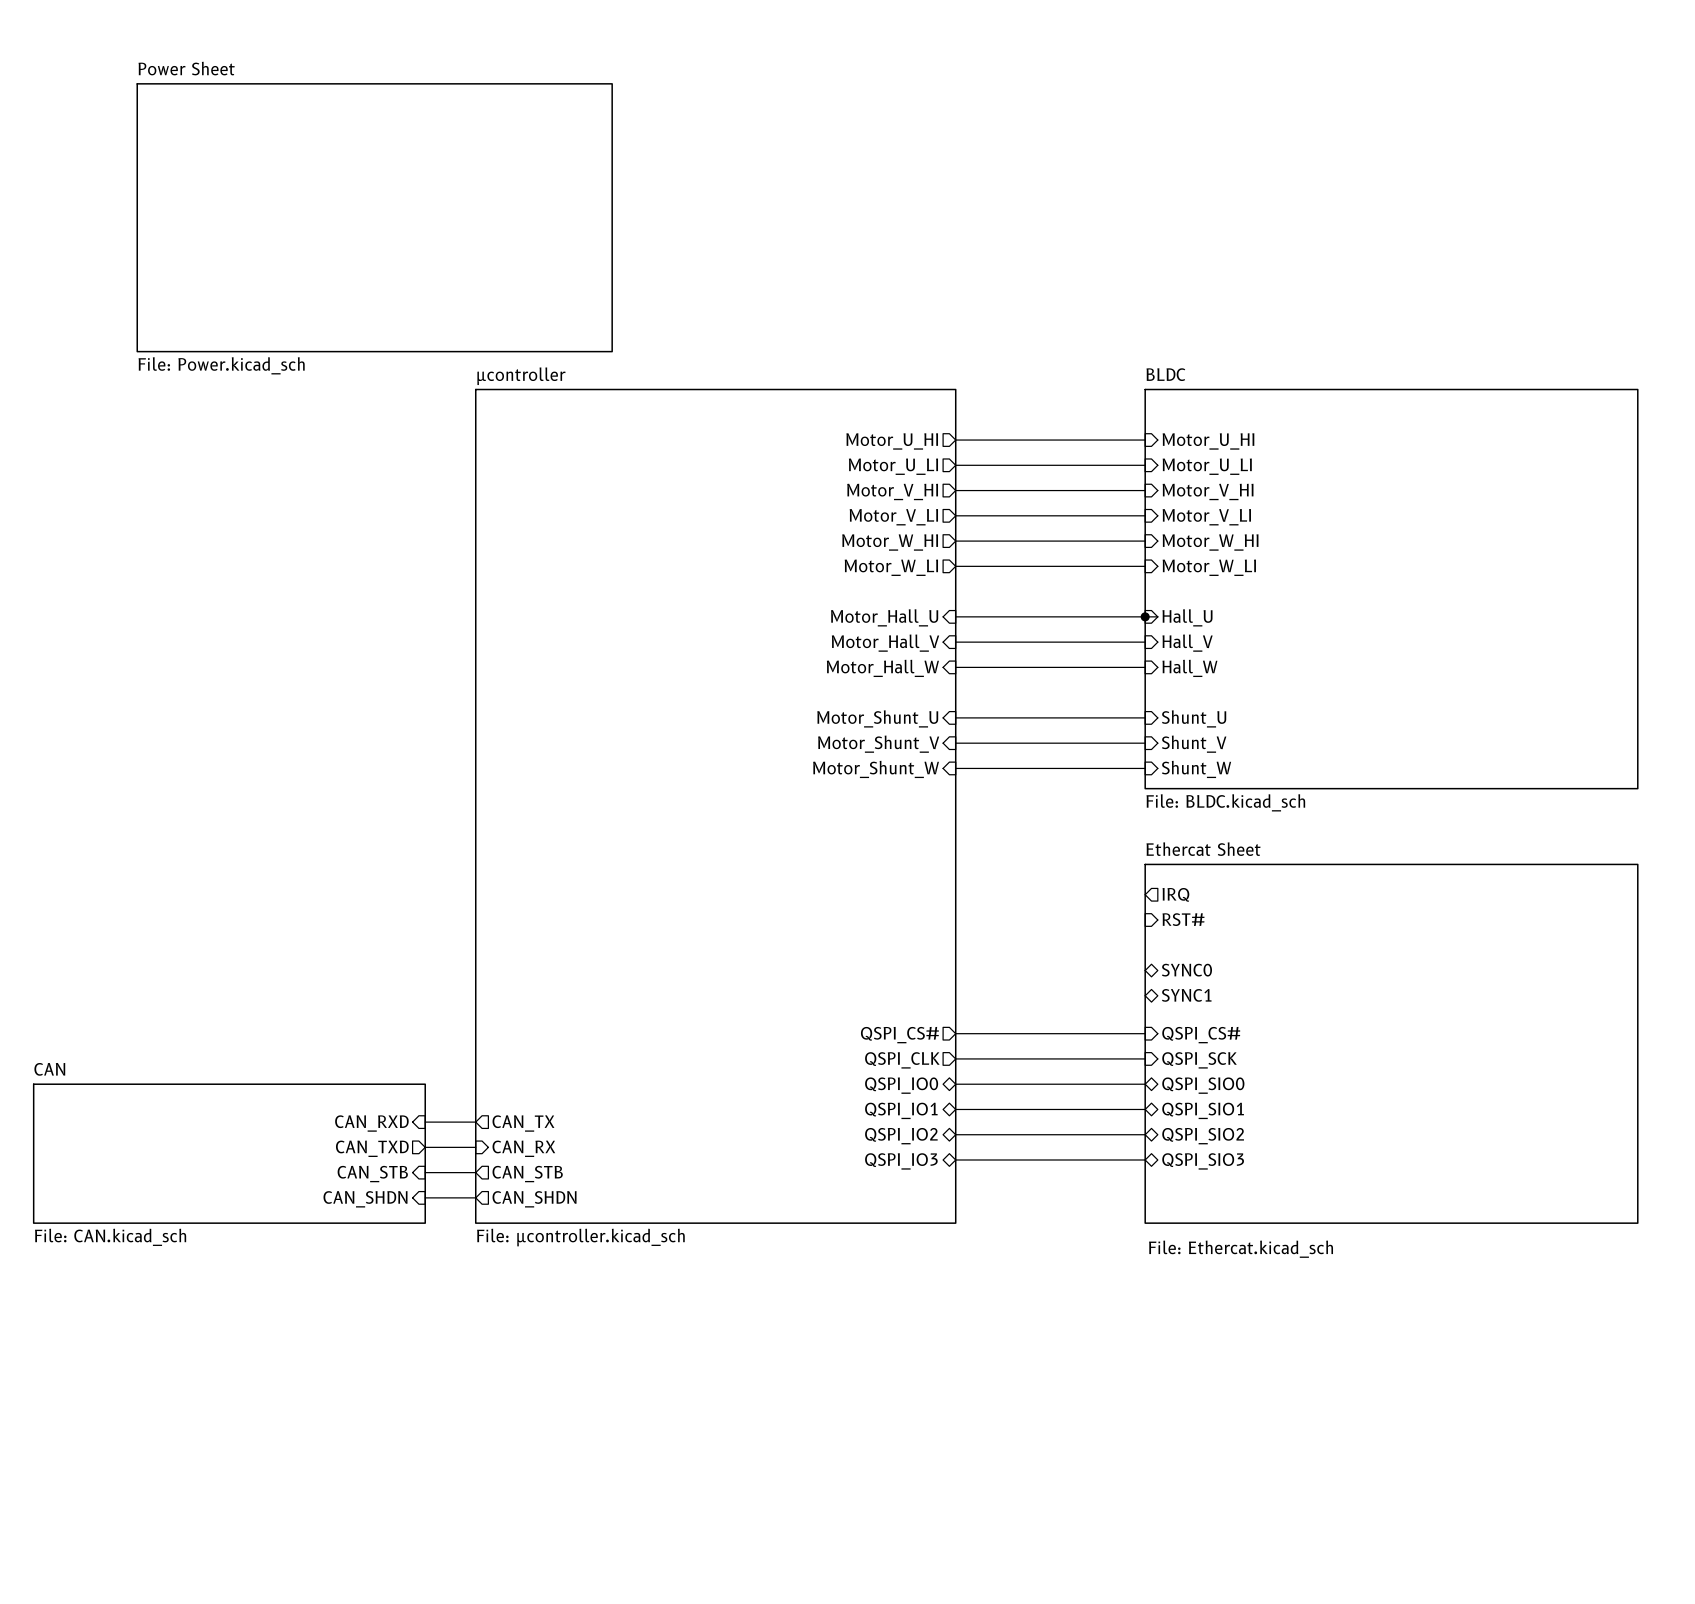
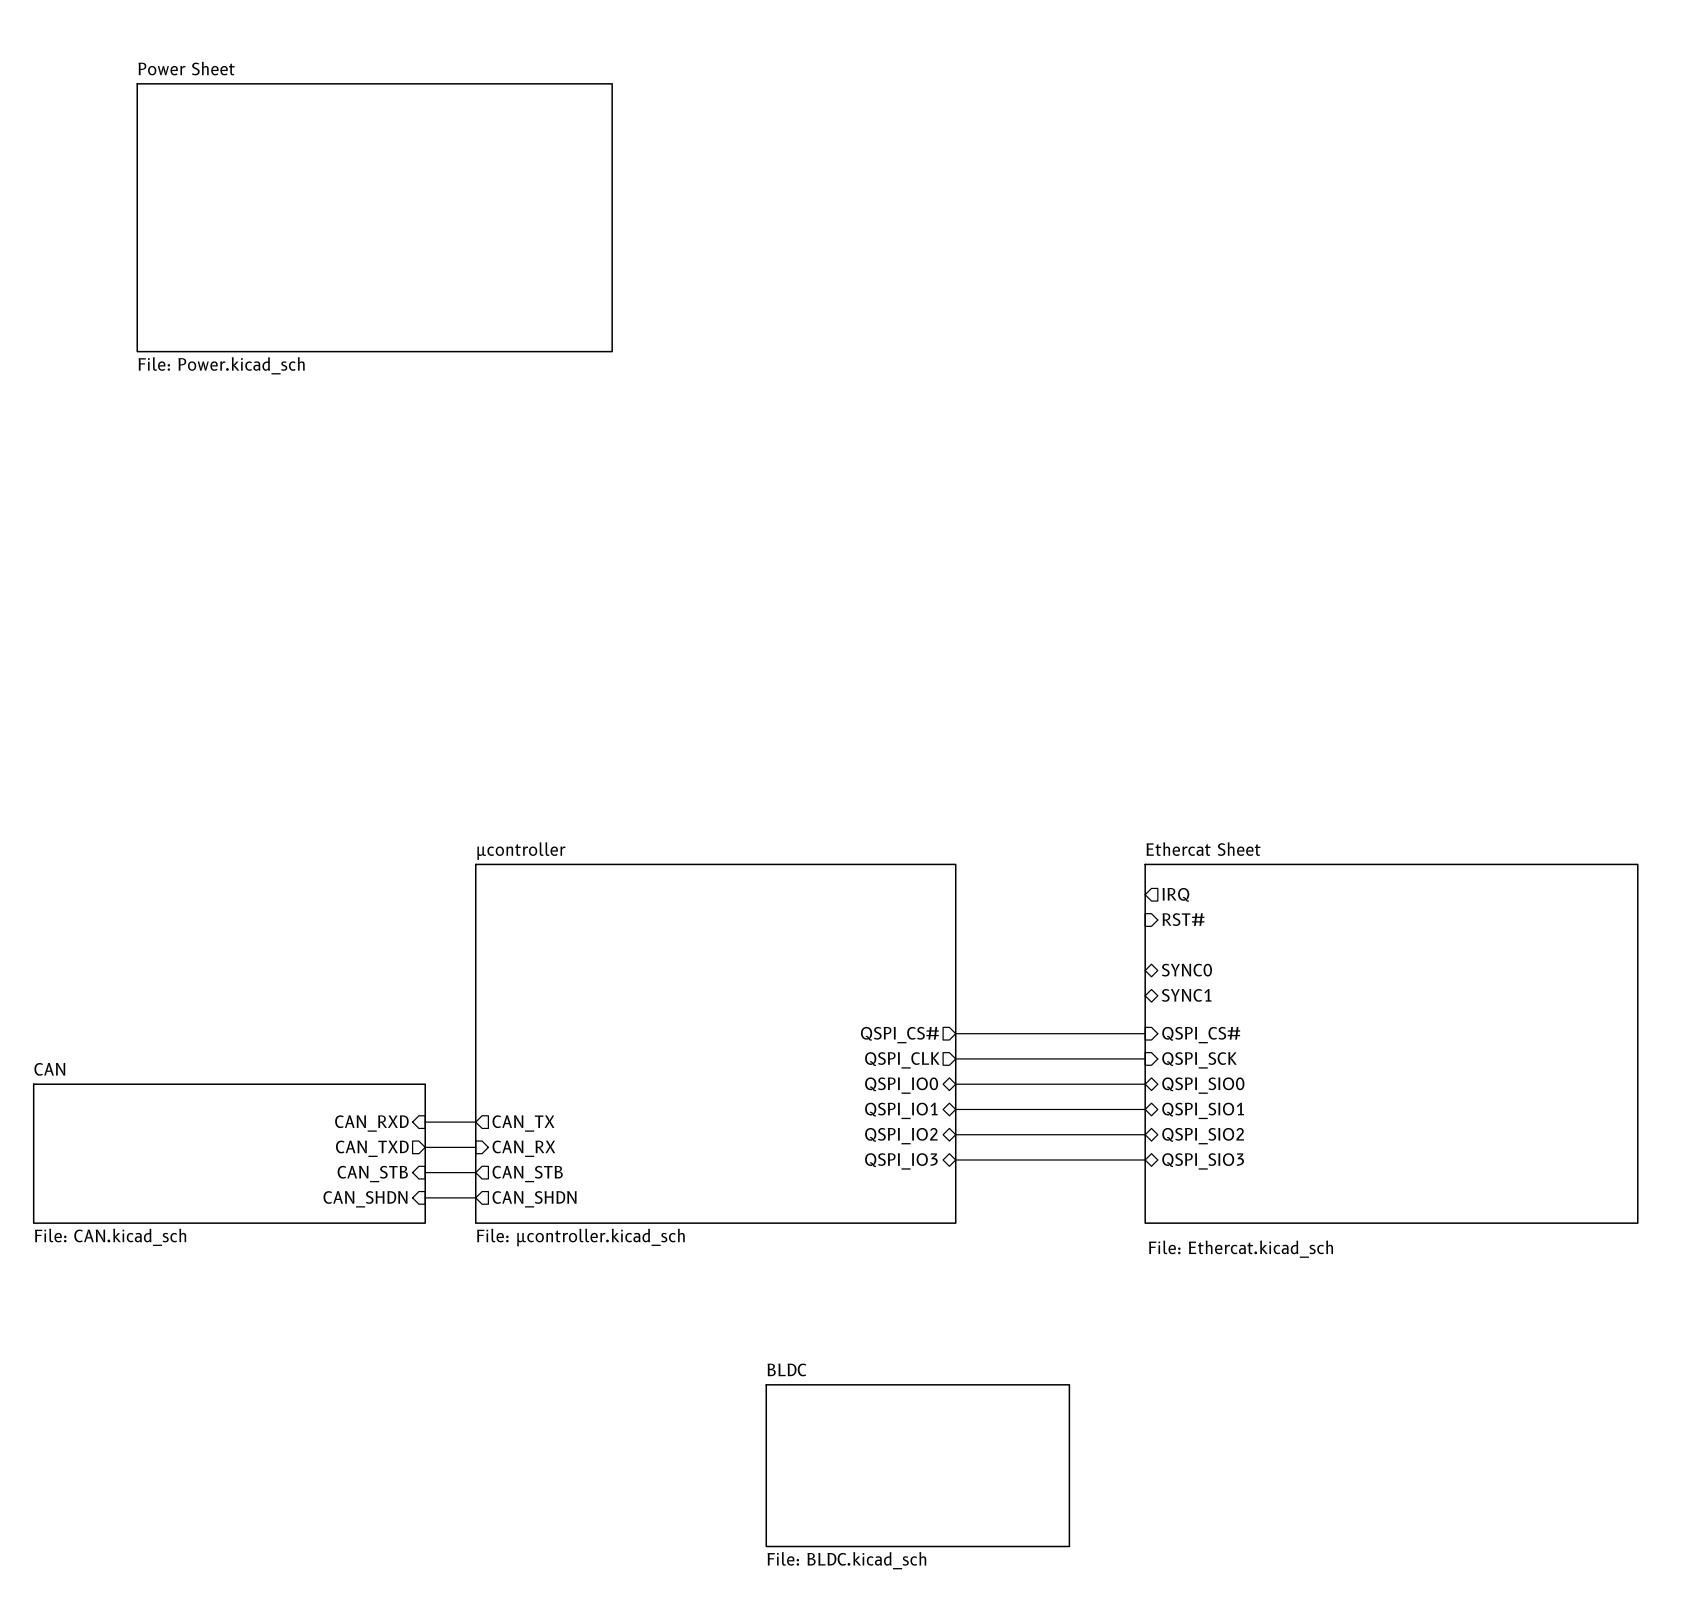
wire: (955, 440) (1145, 440) -> none
sheet pin: Motor_U_HI (892, 441) -> none
sheet pin: Motor_U_HI (1208, 441) -> none
wire: (955, 465) (1145, 465) -> none
sheet pin: Motor_U_LI (893, 466) -> none
sheet pin: Motor_U_LI (1207, 466) -> none
wire: (955, 490) (1145, 490) -> none
sheet pin: Motor_V_HI (892, 491) -> none
sheet pin: Motor_V_HI (1208, 491) -> none
wire: (955, 515) (1145, 515) -> none
sheet pin: Motor_V_LI (893, 517) -> none
sheet pin: Motor_V_LI (1206, 517) -> none
wire: (955, 541) (1145, 541) -> none
sheet pin: Motor_W_HI (890, 542) -> none
sheet pin: Motor_W_HI (1210, 542) -> none
wire: (955, 566) (1145, 566) -> none
sheet pin: Motor_W_LI (891, 567) -> none
sheet pin: Motor_W_LI (1209, 567) -> none
sheet BLDC: File: BLDC.kicad_sch (1391, 589) -> none
wire: (955, 616) (1157, 616) -> none
junction: (1145, 616) -> none
sheet pin: Motor_Hall_U (884, 617) -> none
sheet pin: Hall_U (1187, 617) -> none
wire: (955, 642) (1145, 642) -> none
sheet pin: Motor_Hall_V (885, 643) -> none
sheet pin: Hall_V (1187, 643) -> none
wire: (955, 667) (1145, 667) -> none
sheet pin: Motor_Hall_W (882, 668) -> none
sheet pin: Hall_W (1189, 668) -> none
wire: (955, 717) (1145, 717) -> none
sheet pin: Motor_Shunt_U (877, 718) -> none
sheet pin: Shunt_U (1194, 718) -> none
wire: (955, 743) (1145, 743) -> none
sheet pin: Motor_Shunt_V (878, 744) -> none
sheet pin: Shunt_V (1194, 744) -> none
wire: (955, 768) (1145, 768) -> none
sheet pin: Motor_Shunt_W (876, 769) -> none
sheet pin: Shunt_W (1196, 769) -> none
sheet µcontroller: File: µcontroller.kicad_sch (715, 806) -> none
sheet µcontroller: none -> File: µcontroller.kicad_sch (715, 1043)
sheet BLDC: none -> File: BLDC.kicad_sch (917, 1465)

